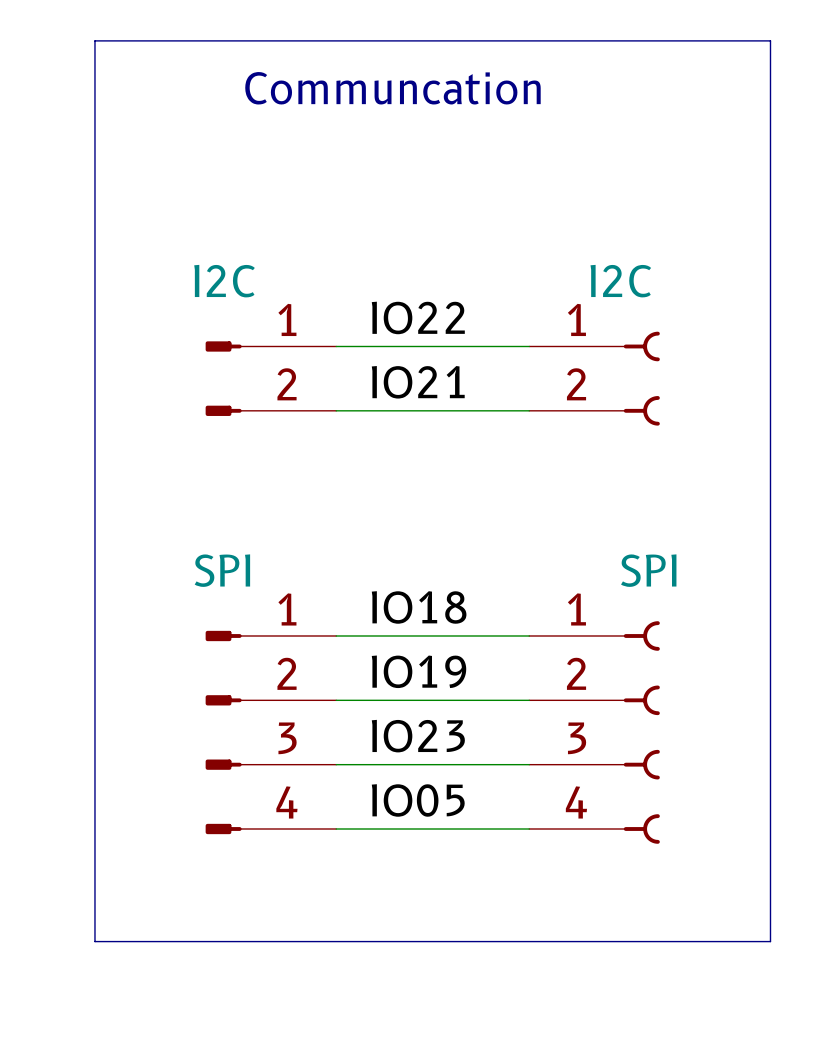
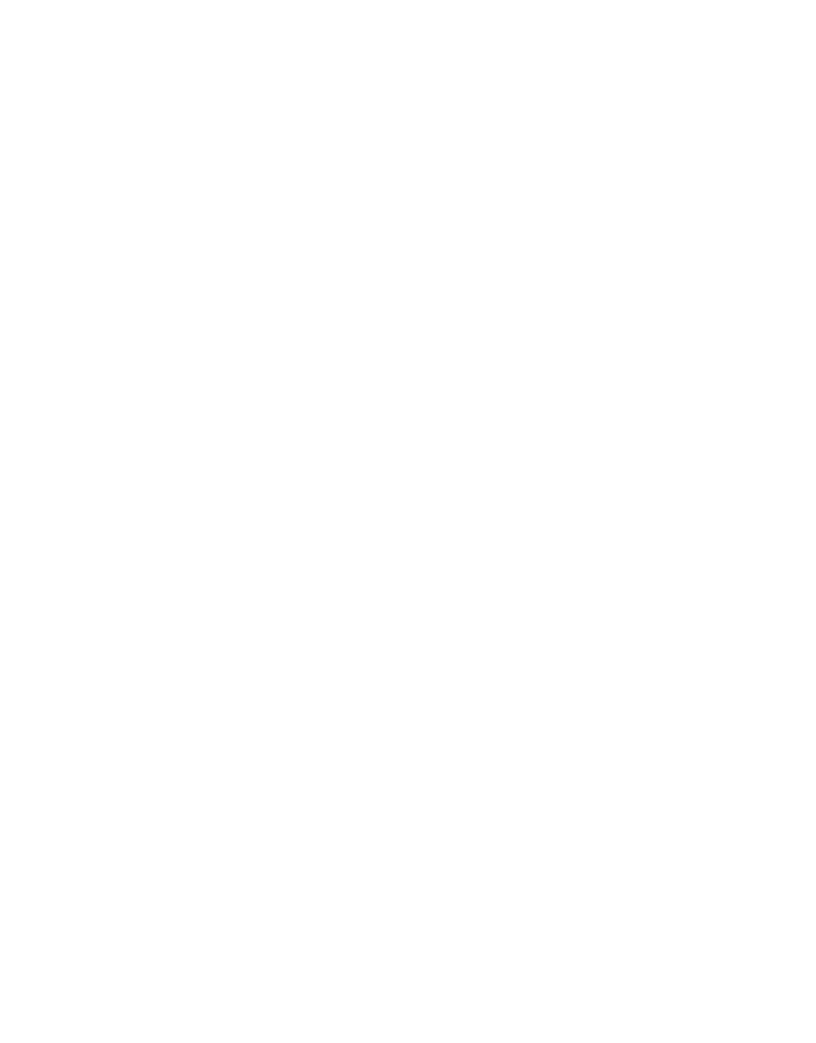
line: (94, 40) (770, 40) (770, 941) (94, 941) (94, 40) -> none
text: Communcation (392, 88) -> none
label: IO22 (418, 317) -> none
wire: (336, 346) (529, 346) -> none
part: I2C (270, 378) -> none
part: I2C (594, 378) -> none
label: IO21 (418, 382) -> none
wire: (336, 410) (529, 410) -> none
label: IO18 (419, 607) -> none
wire: (336, 635) (529, 635) -> none
label: IO19 (419, 671) -> none
wire: (336, 700) (529, 700) -> none
part: SPI (270, 732) -> none
part: SPI (594, 732) -> none
label: IO23 (418, 736) -> none
wire: (336, 764) (529, 764) -> none
label: IO05 (418, 800) -> none
wire: (336, 829) (529, 829) -> none

